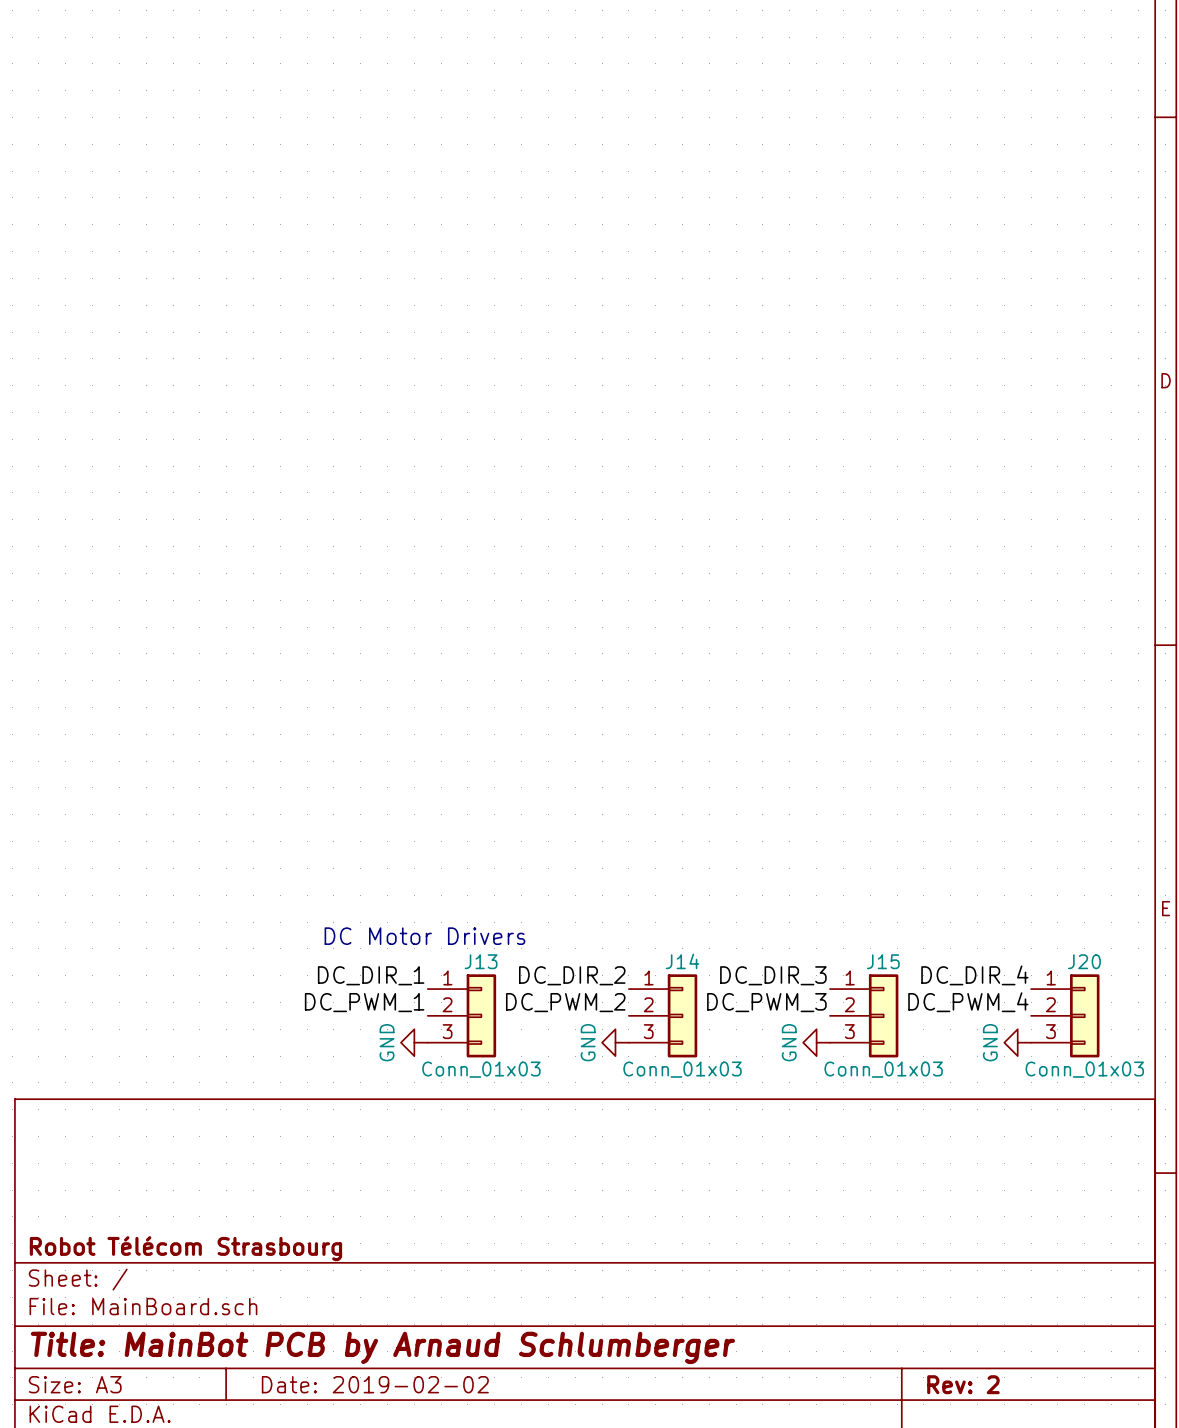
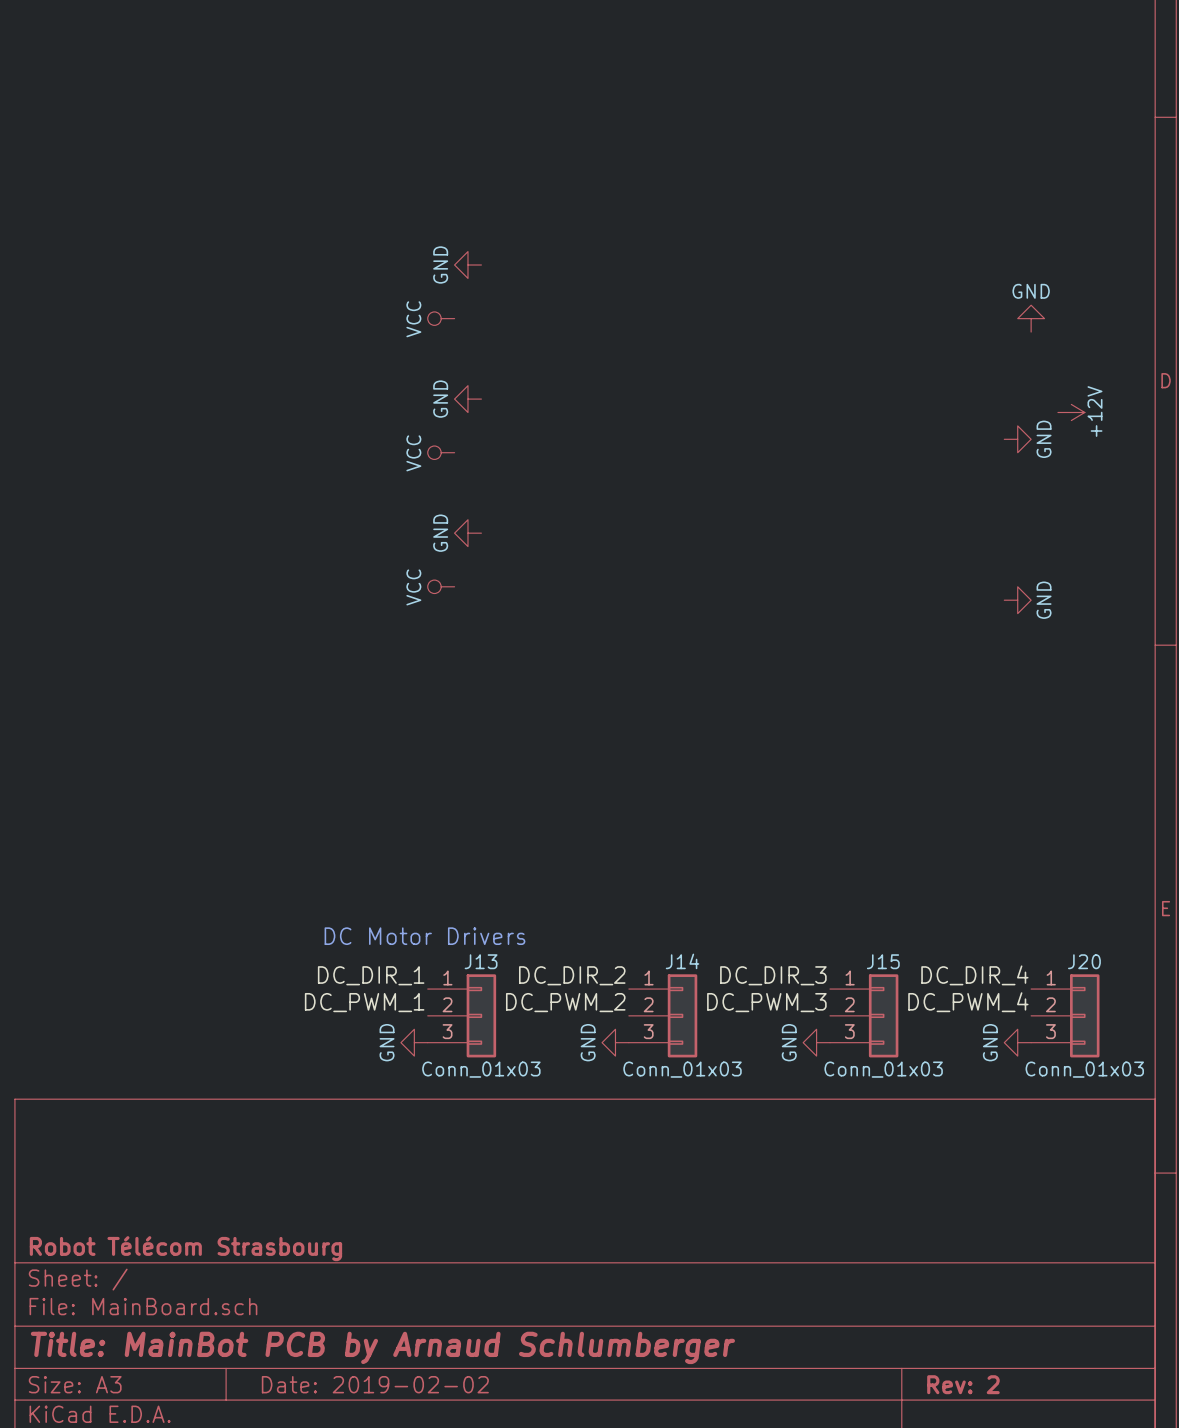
power symbol: none -> GND (467, 265)
power symbol: none -> VCC (441, 318)
power symbol: none -> GND (1031, 318)
power symbol: none -> GND (467, 399)
power symbol: none -> +12V (1071, 412)
power symbol: none -> GND (1017, 439)
power symbol: none -> VCC (441, 452)
power symbol: none -> GND (467, 533)
power symbol: none -> VCC (441, 586)
power symbol: none -> GND (1017, 600)

